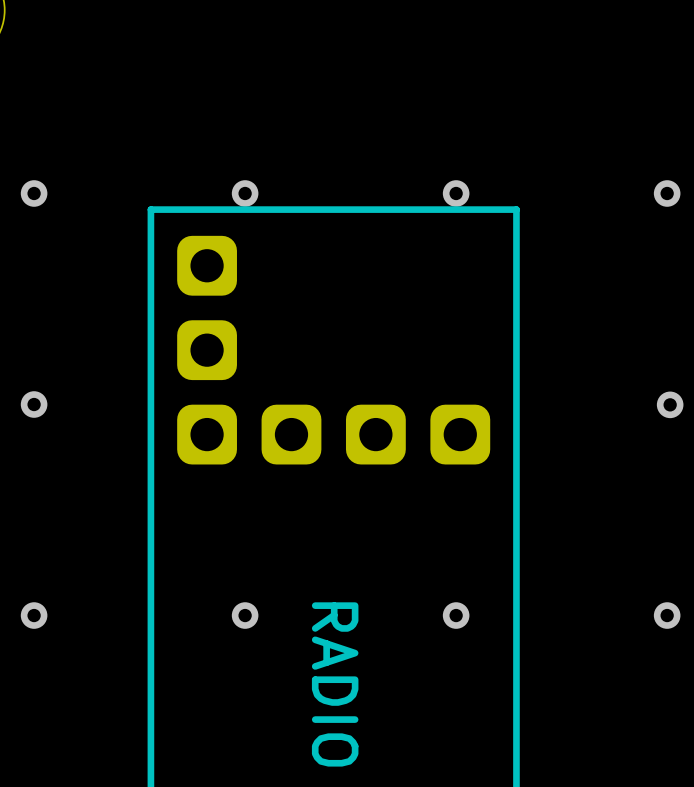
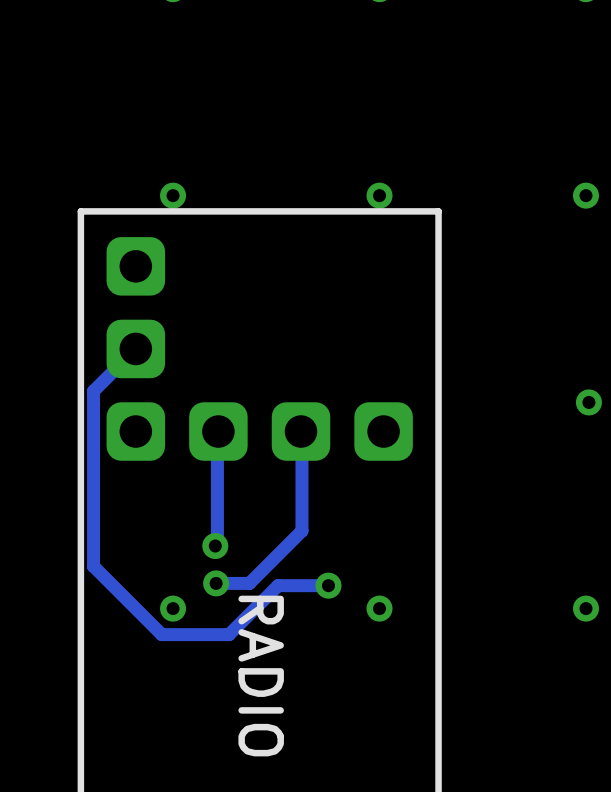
track: none -> (135, 348) (93, 391) (93, 566) (161, 634) (229, 634) (278, 585) (328, 585)
track: none -> (217, 432) (217, 543) (215, 546)
track: none -> (301, 432) (301, 530) (249, 583) (216, 583)
via: none -> (215, 546)
via: none -> (216, 583)
via: none -> (328, 585)

